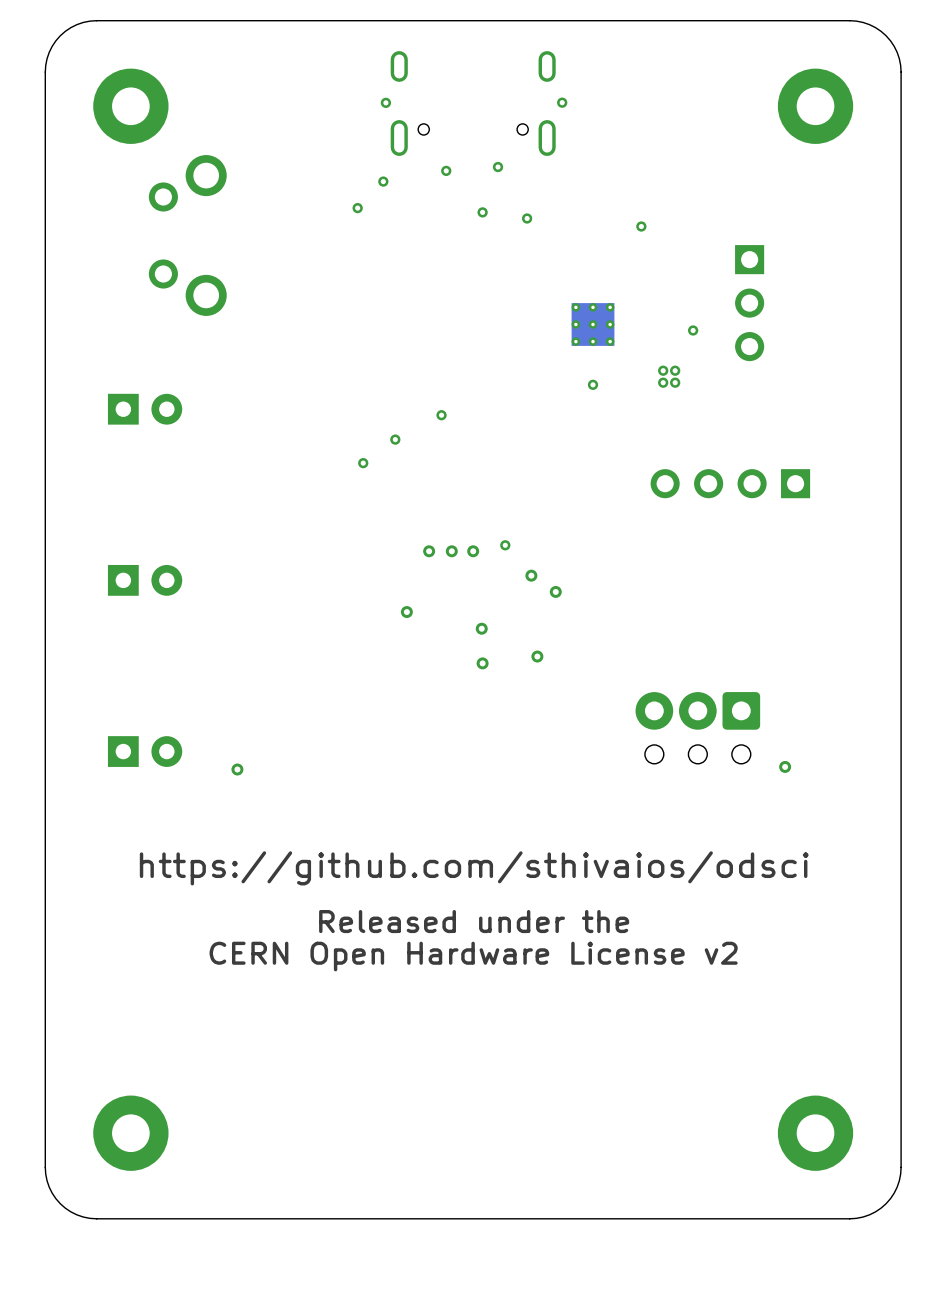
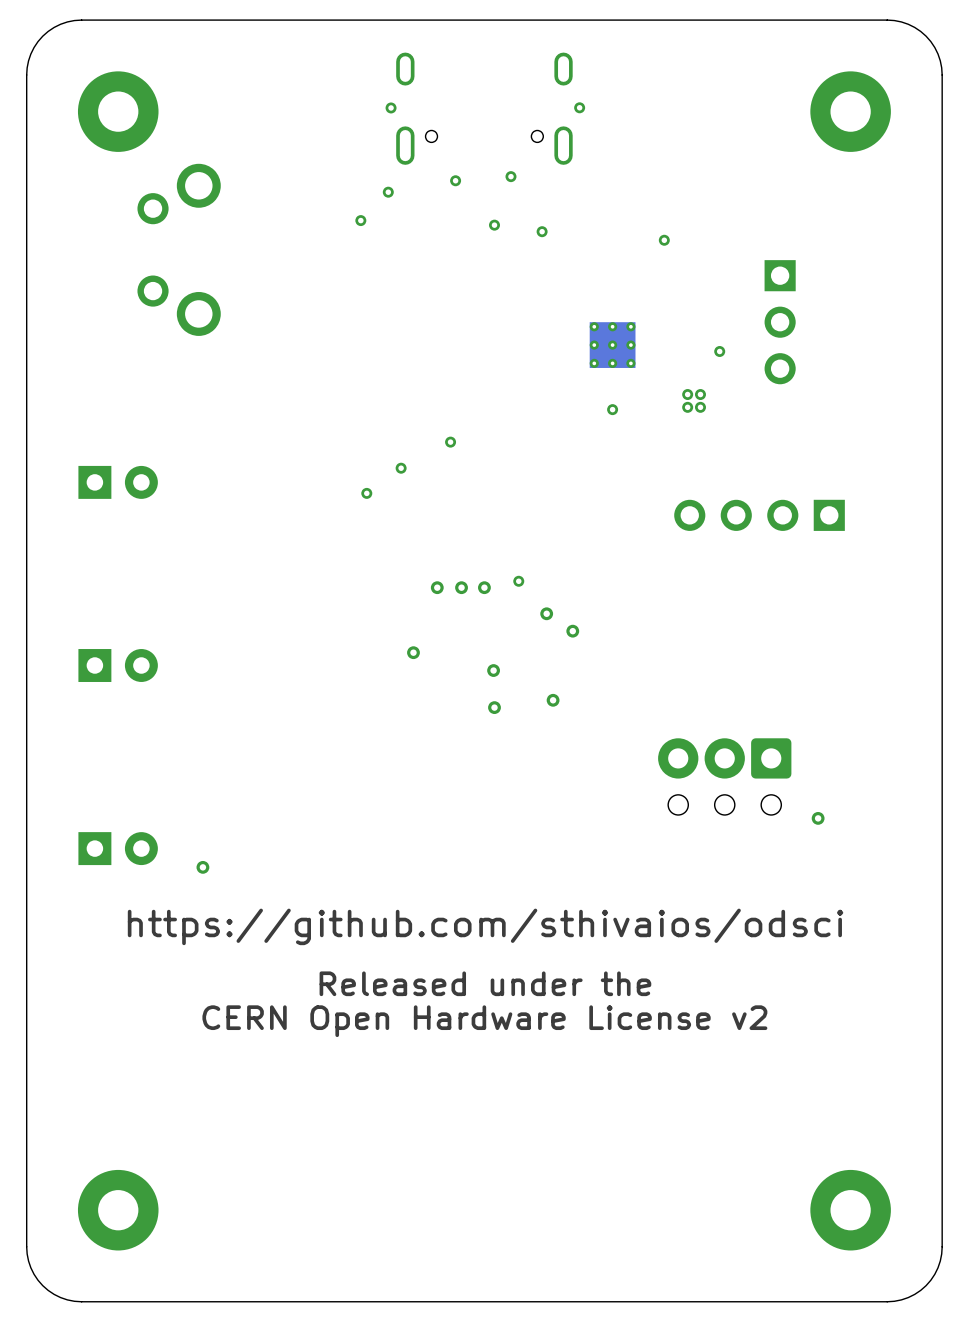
part position: (145, 409) -> (118, 482)
part position: (145, 580) -> (118, 665)
part position: (145, 751) -> (118, 848)
via position: (237, 769) -> (202, 867)

